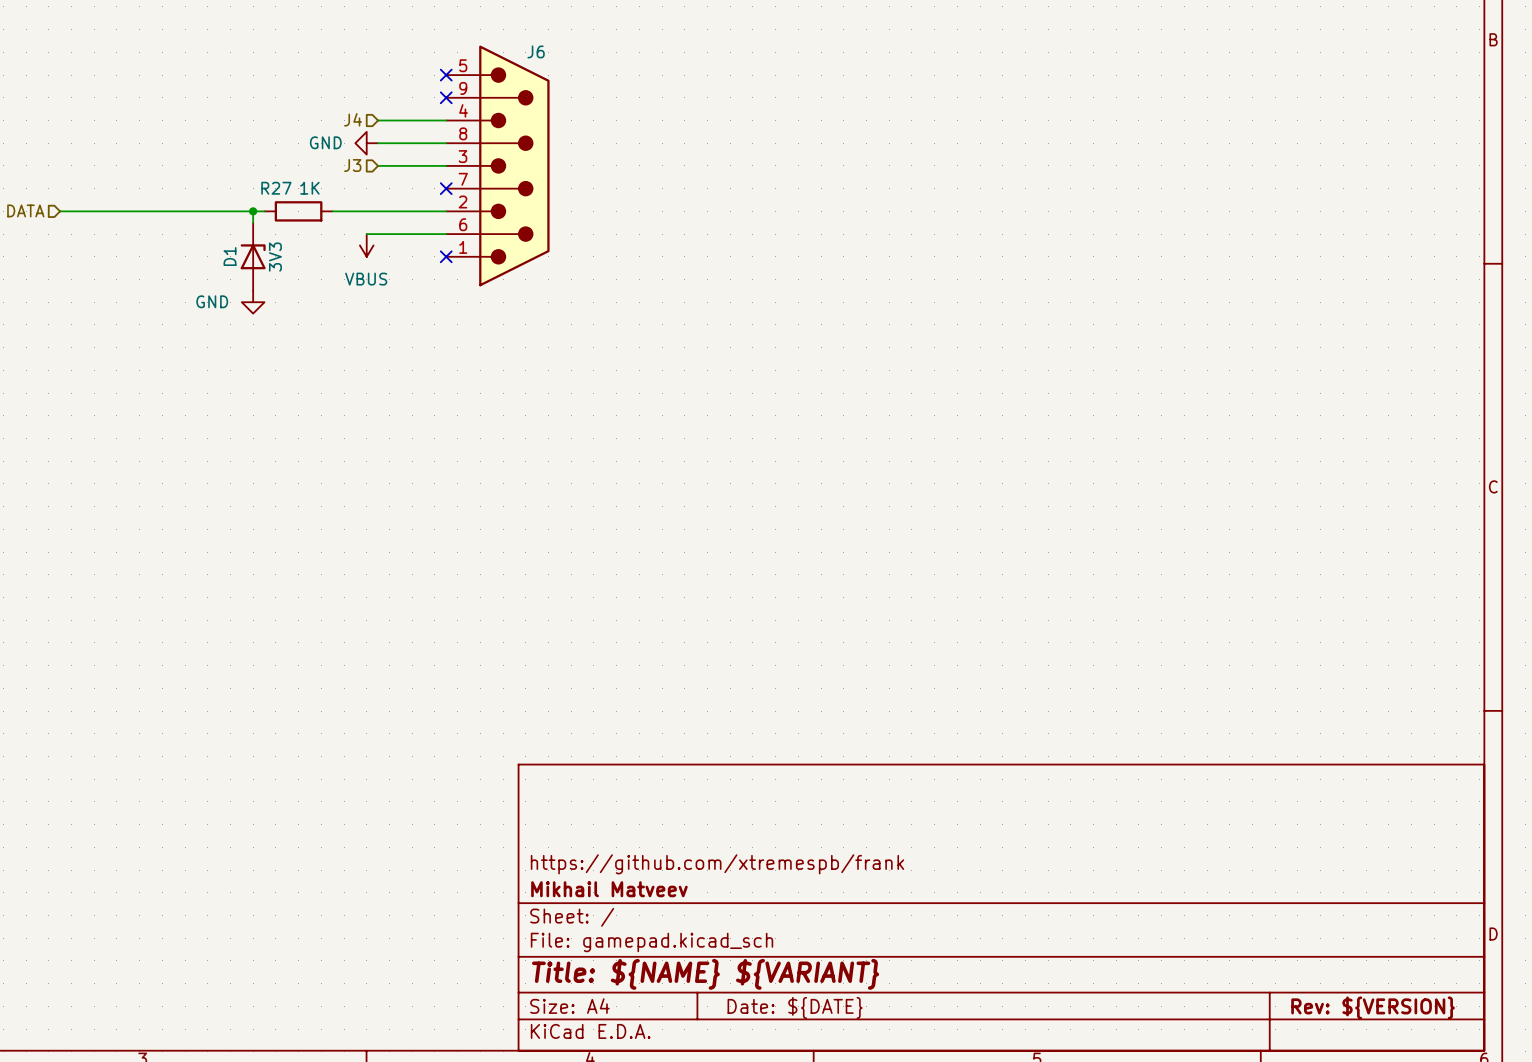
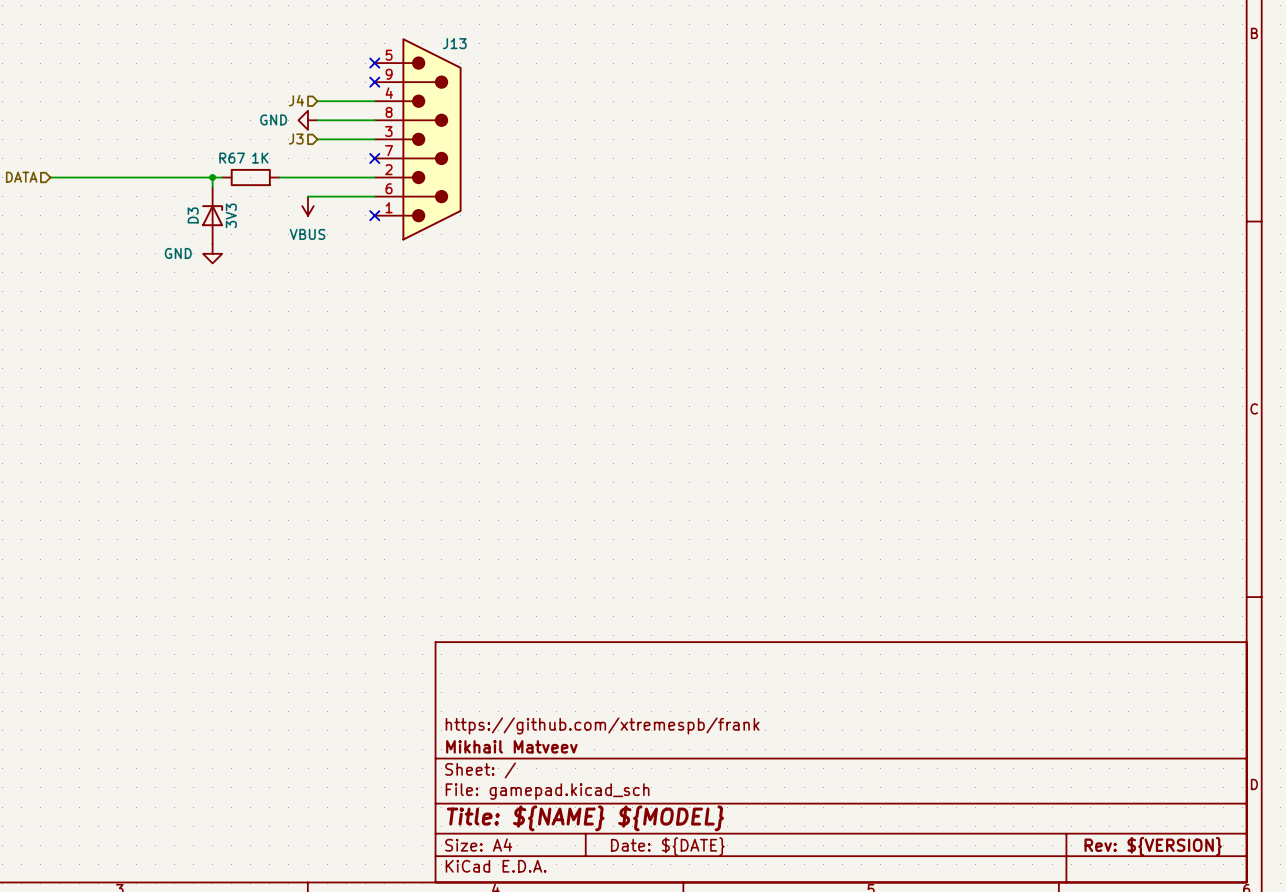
J6 name: J6 (536, 51) -> J13 (454, 43)
R27 name: R27 (276, 188) -> R67 (232, 158)
D1 name: D1 (230, 256) -> D3 (193, 215)
title block: Title: ${NAME} ${VARIANT} (705, 974) -> Title: ${NAME} ${MODEL} (585, 818)

